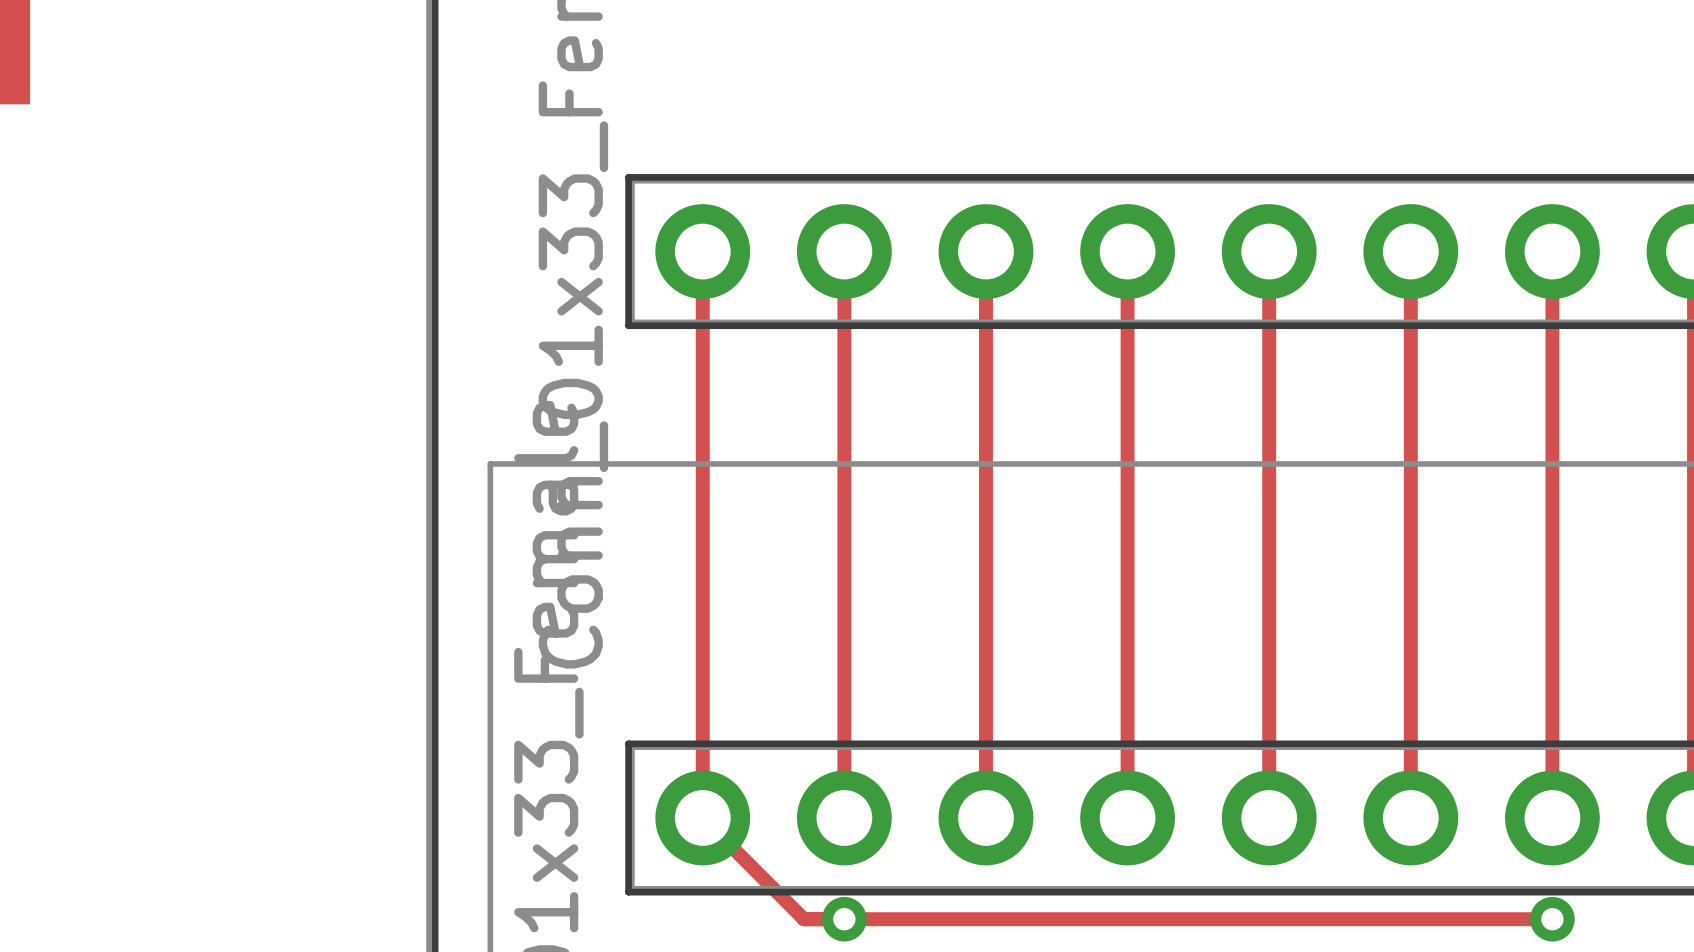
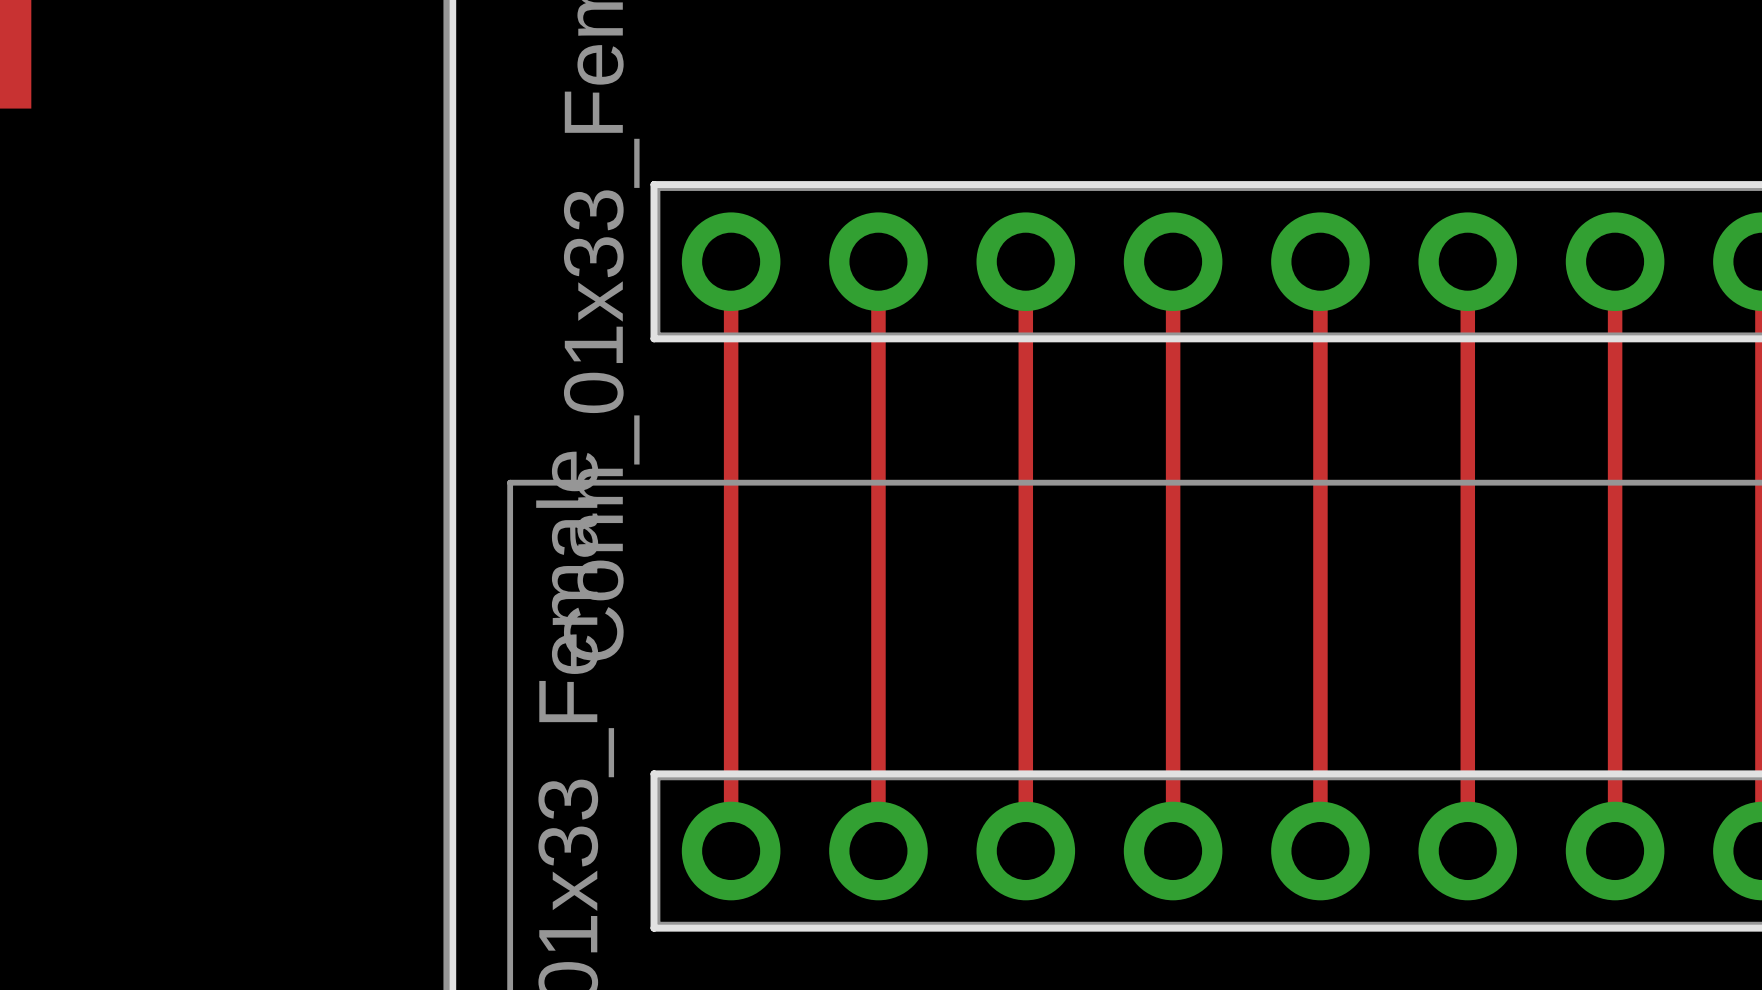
track: (702, 817) (803, 919) (1552, 919) -> none
via: (844, 919) -> none
via: (1552, 919) -> none

